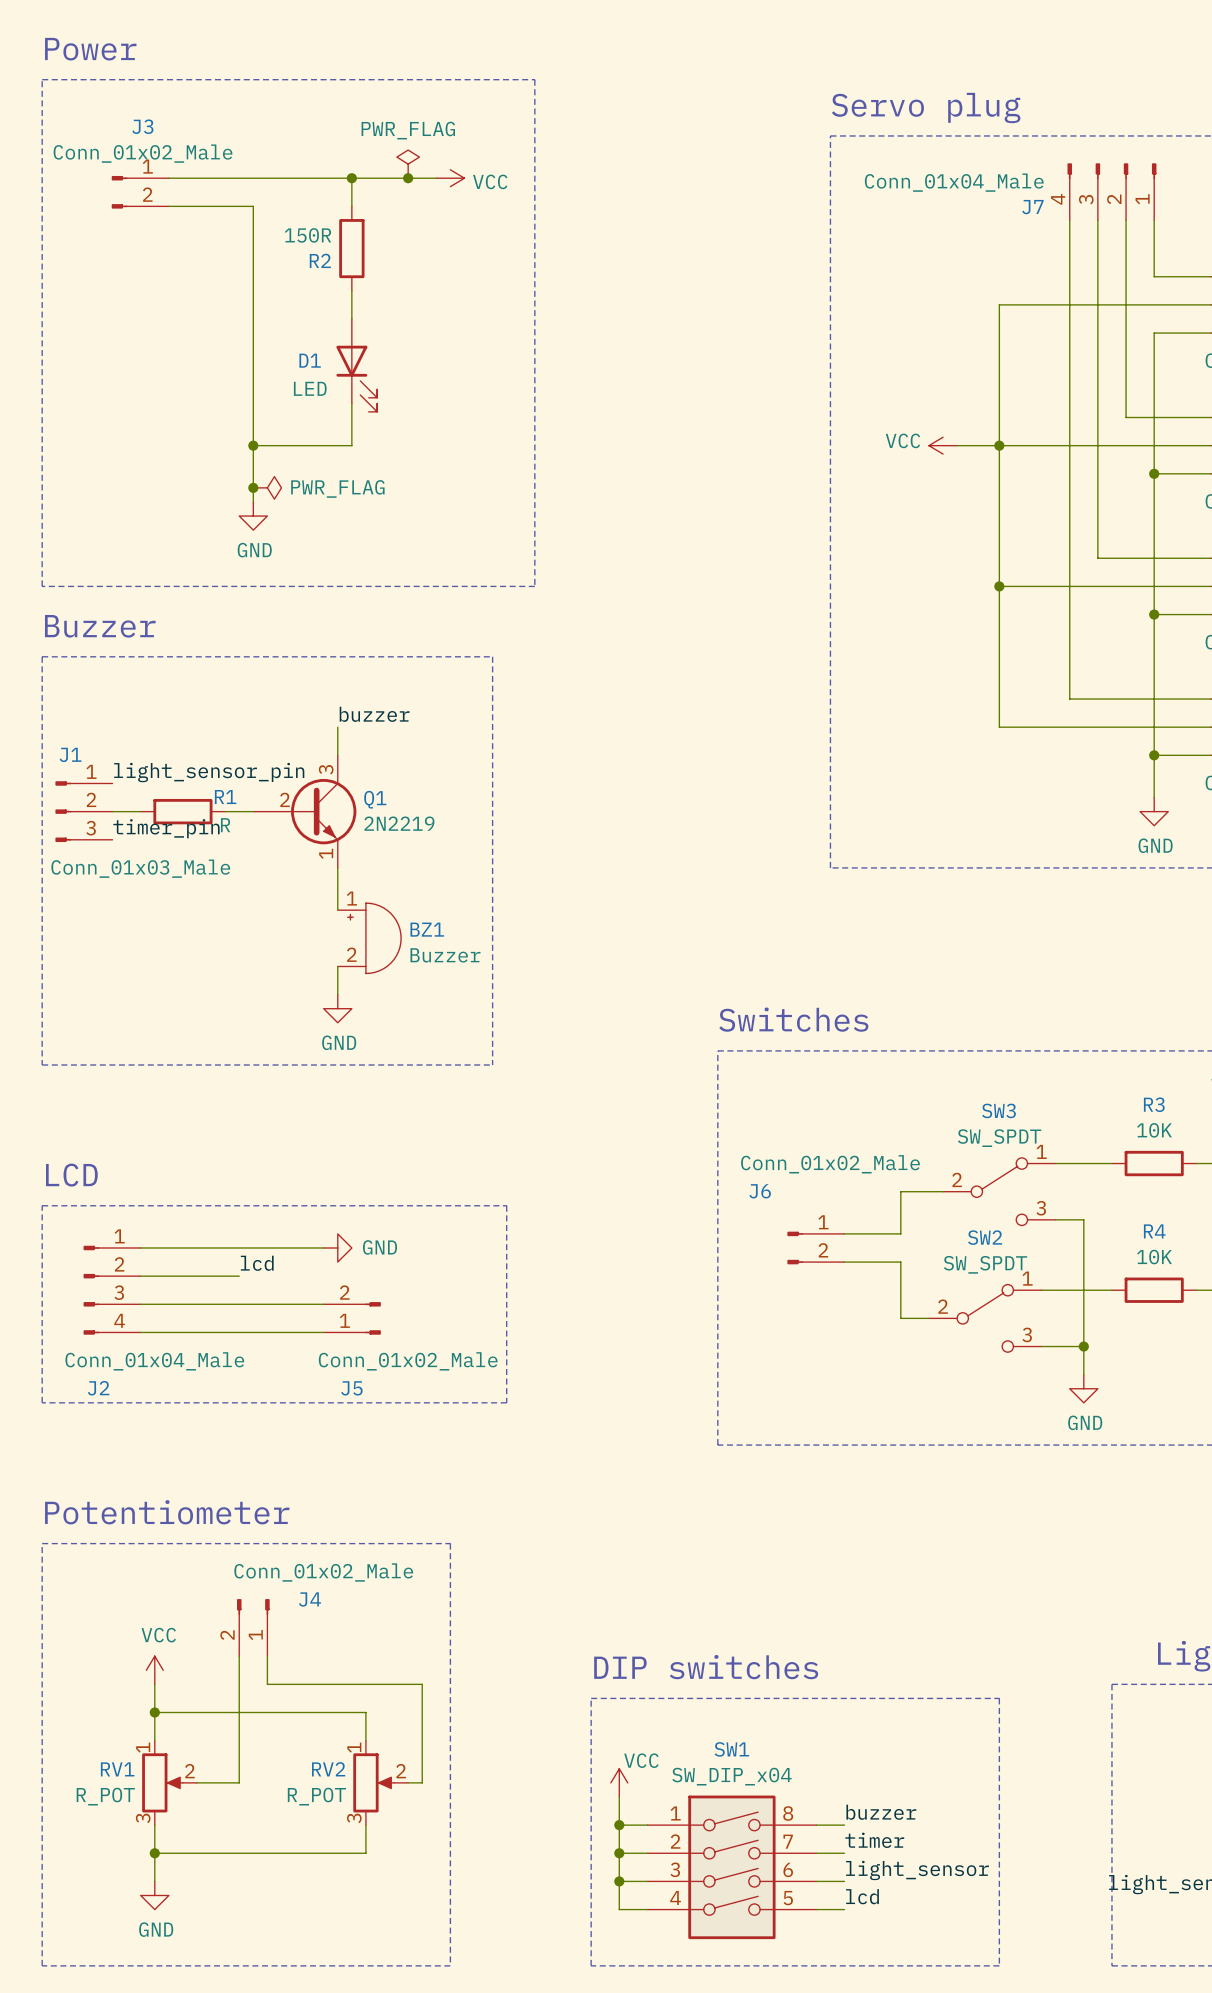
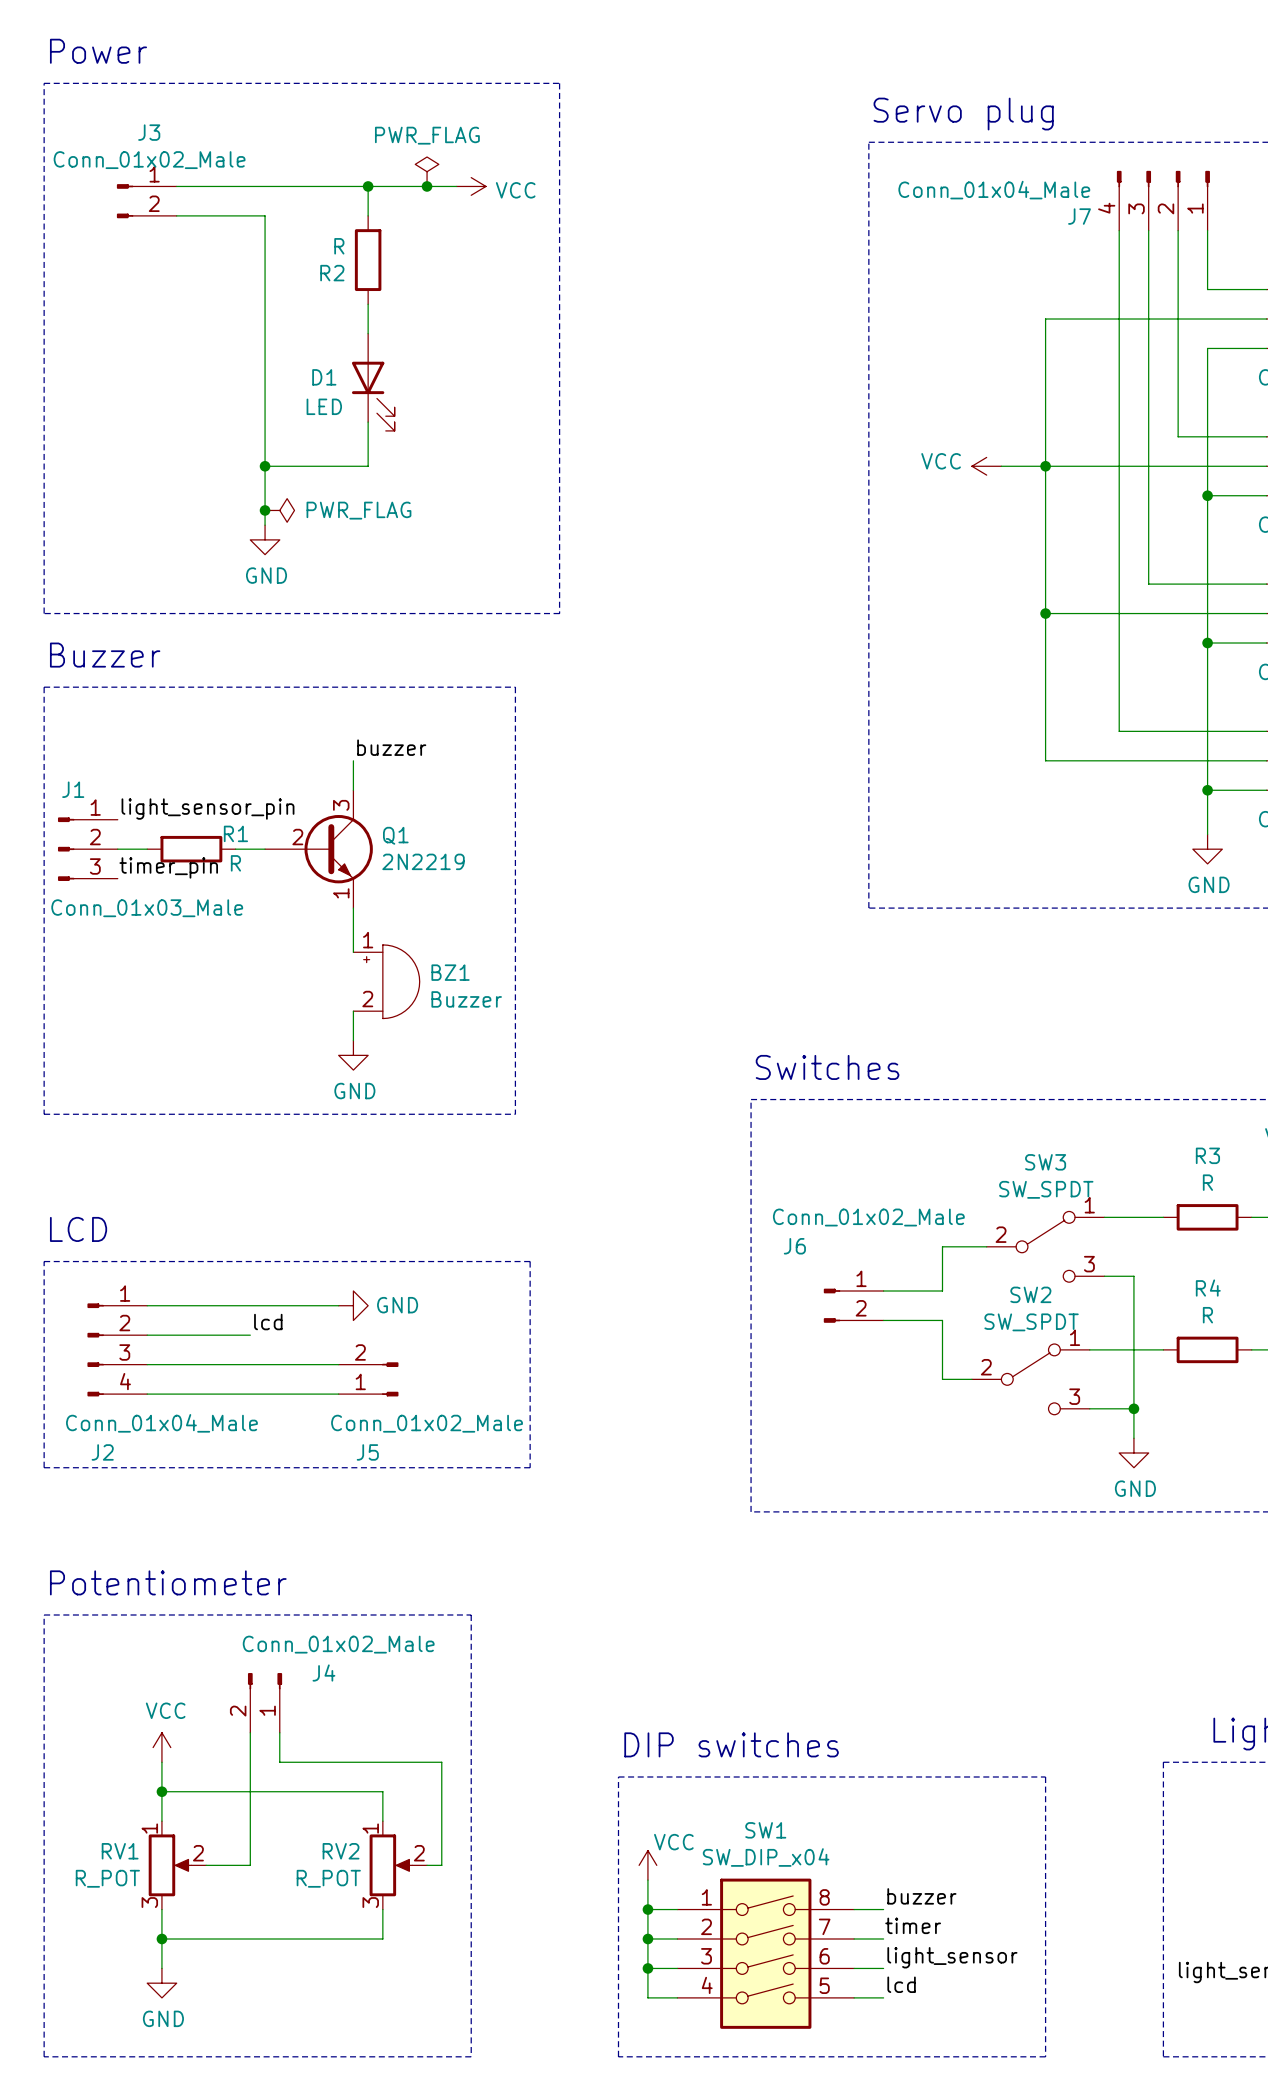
R2 value: 150R (307, 235) -> R (339, 246)
R3 value: 10K (1154, 1130) -> R (1207, 1182)
R4 value: 10K (1154, 1257) -> R (1207, 1315)

